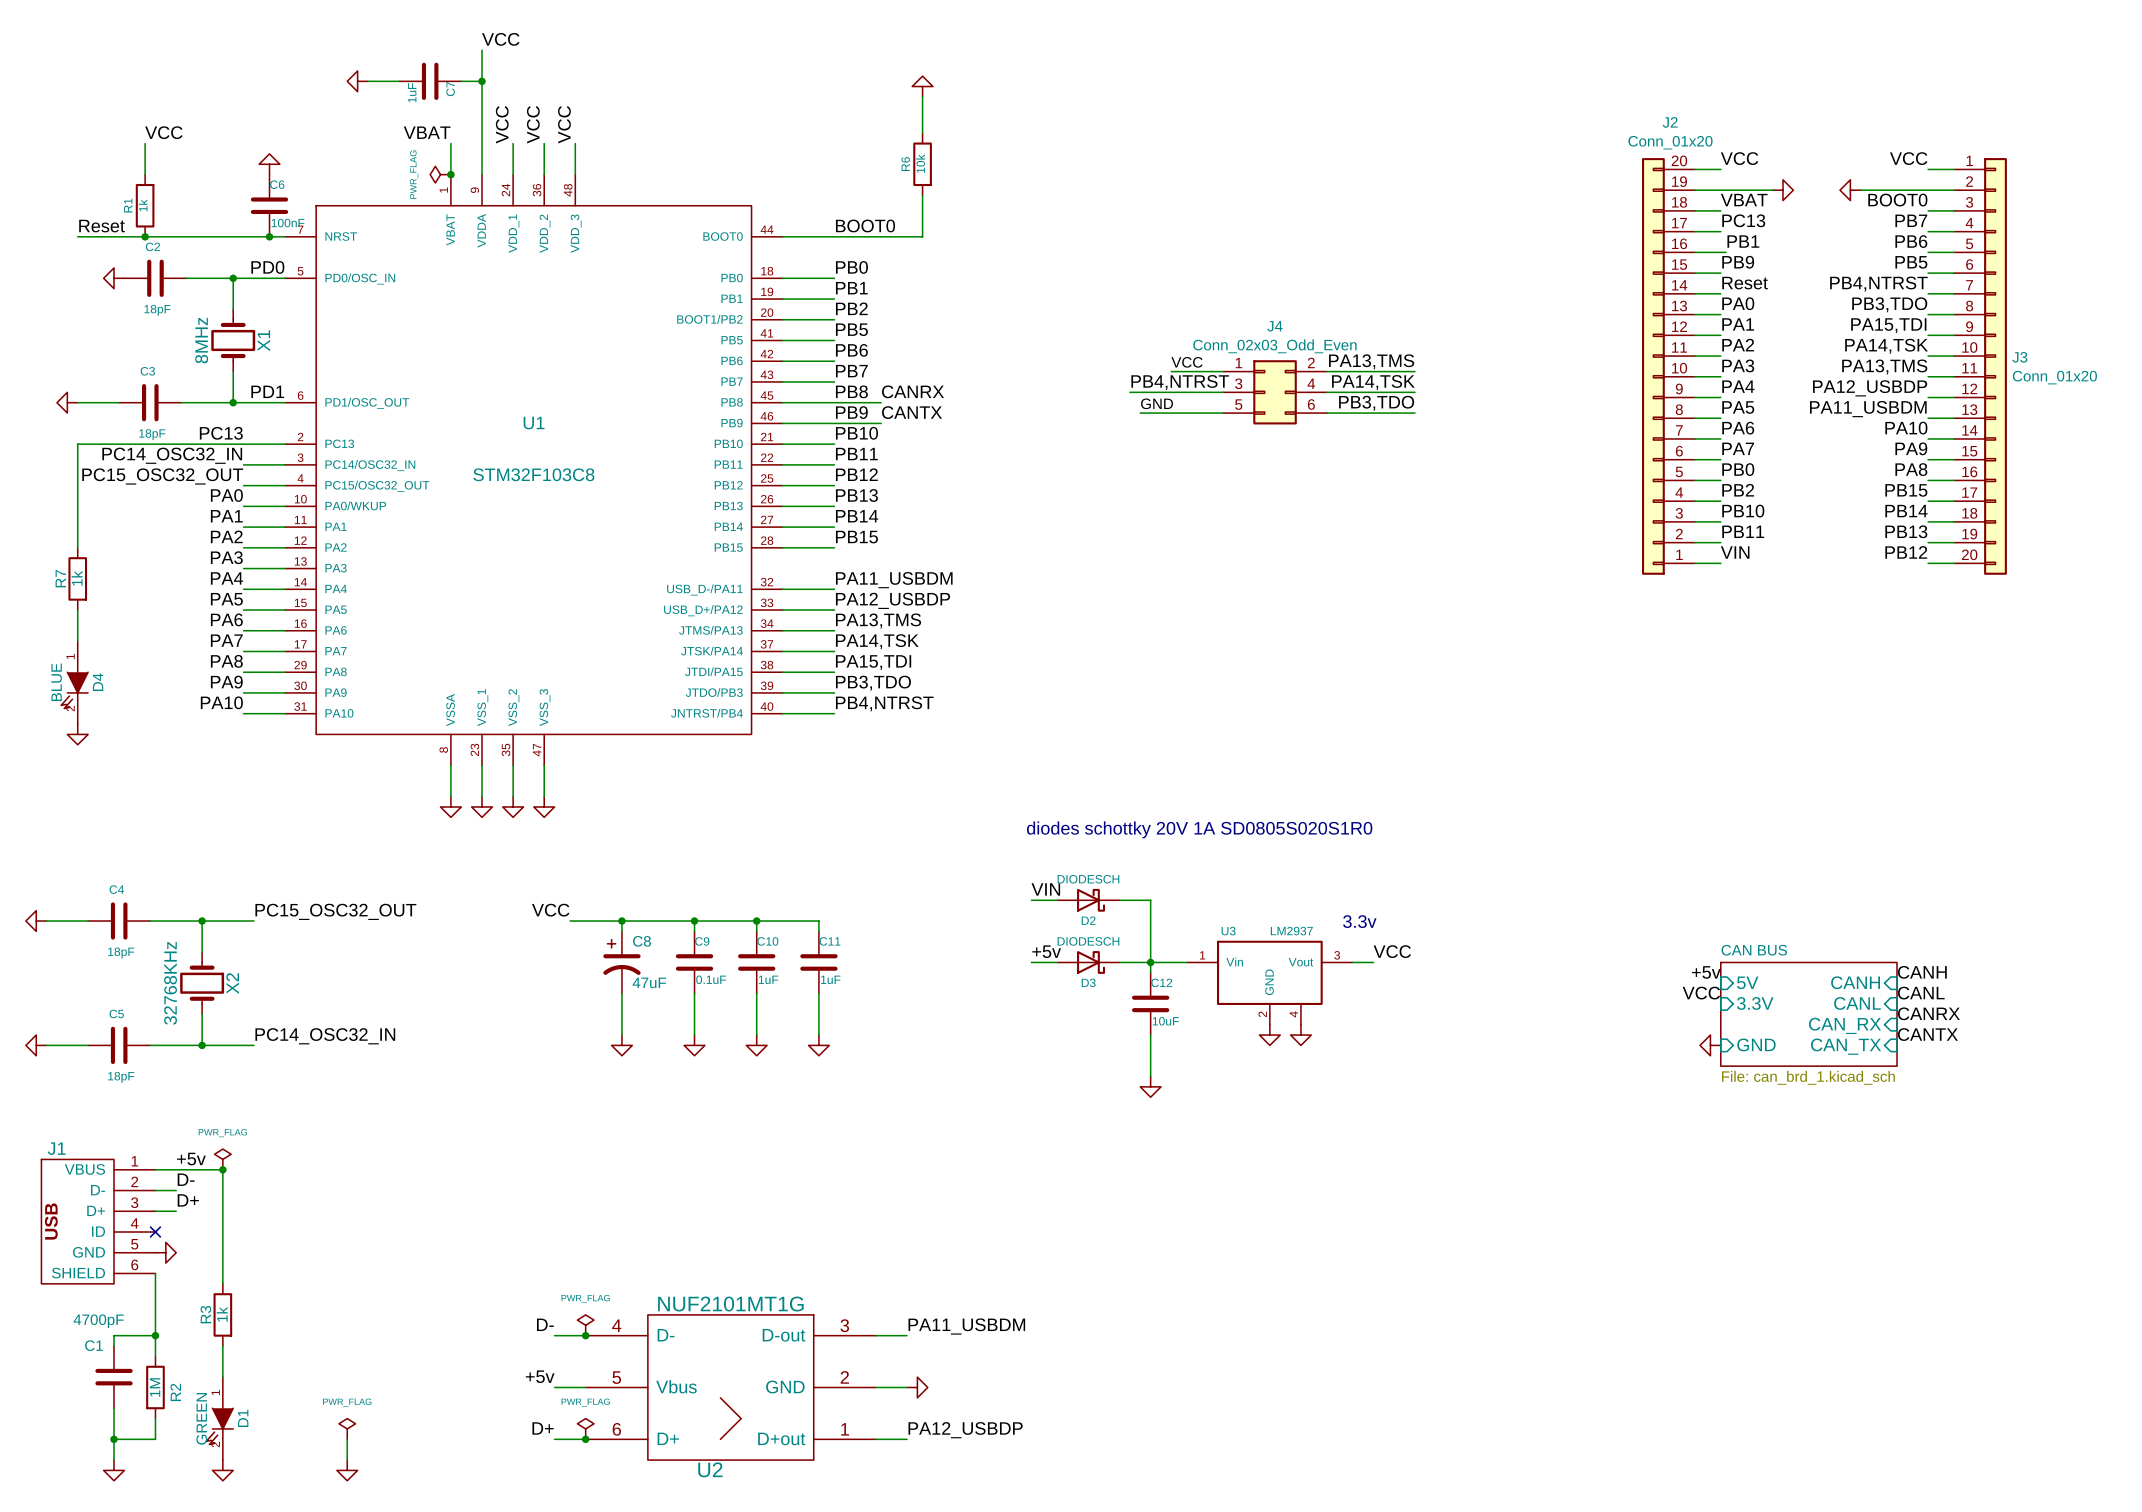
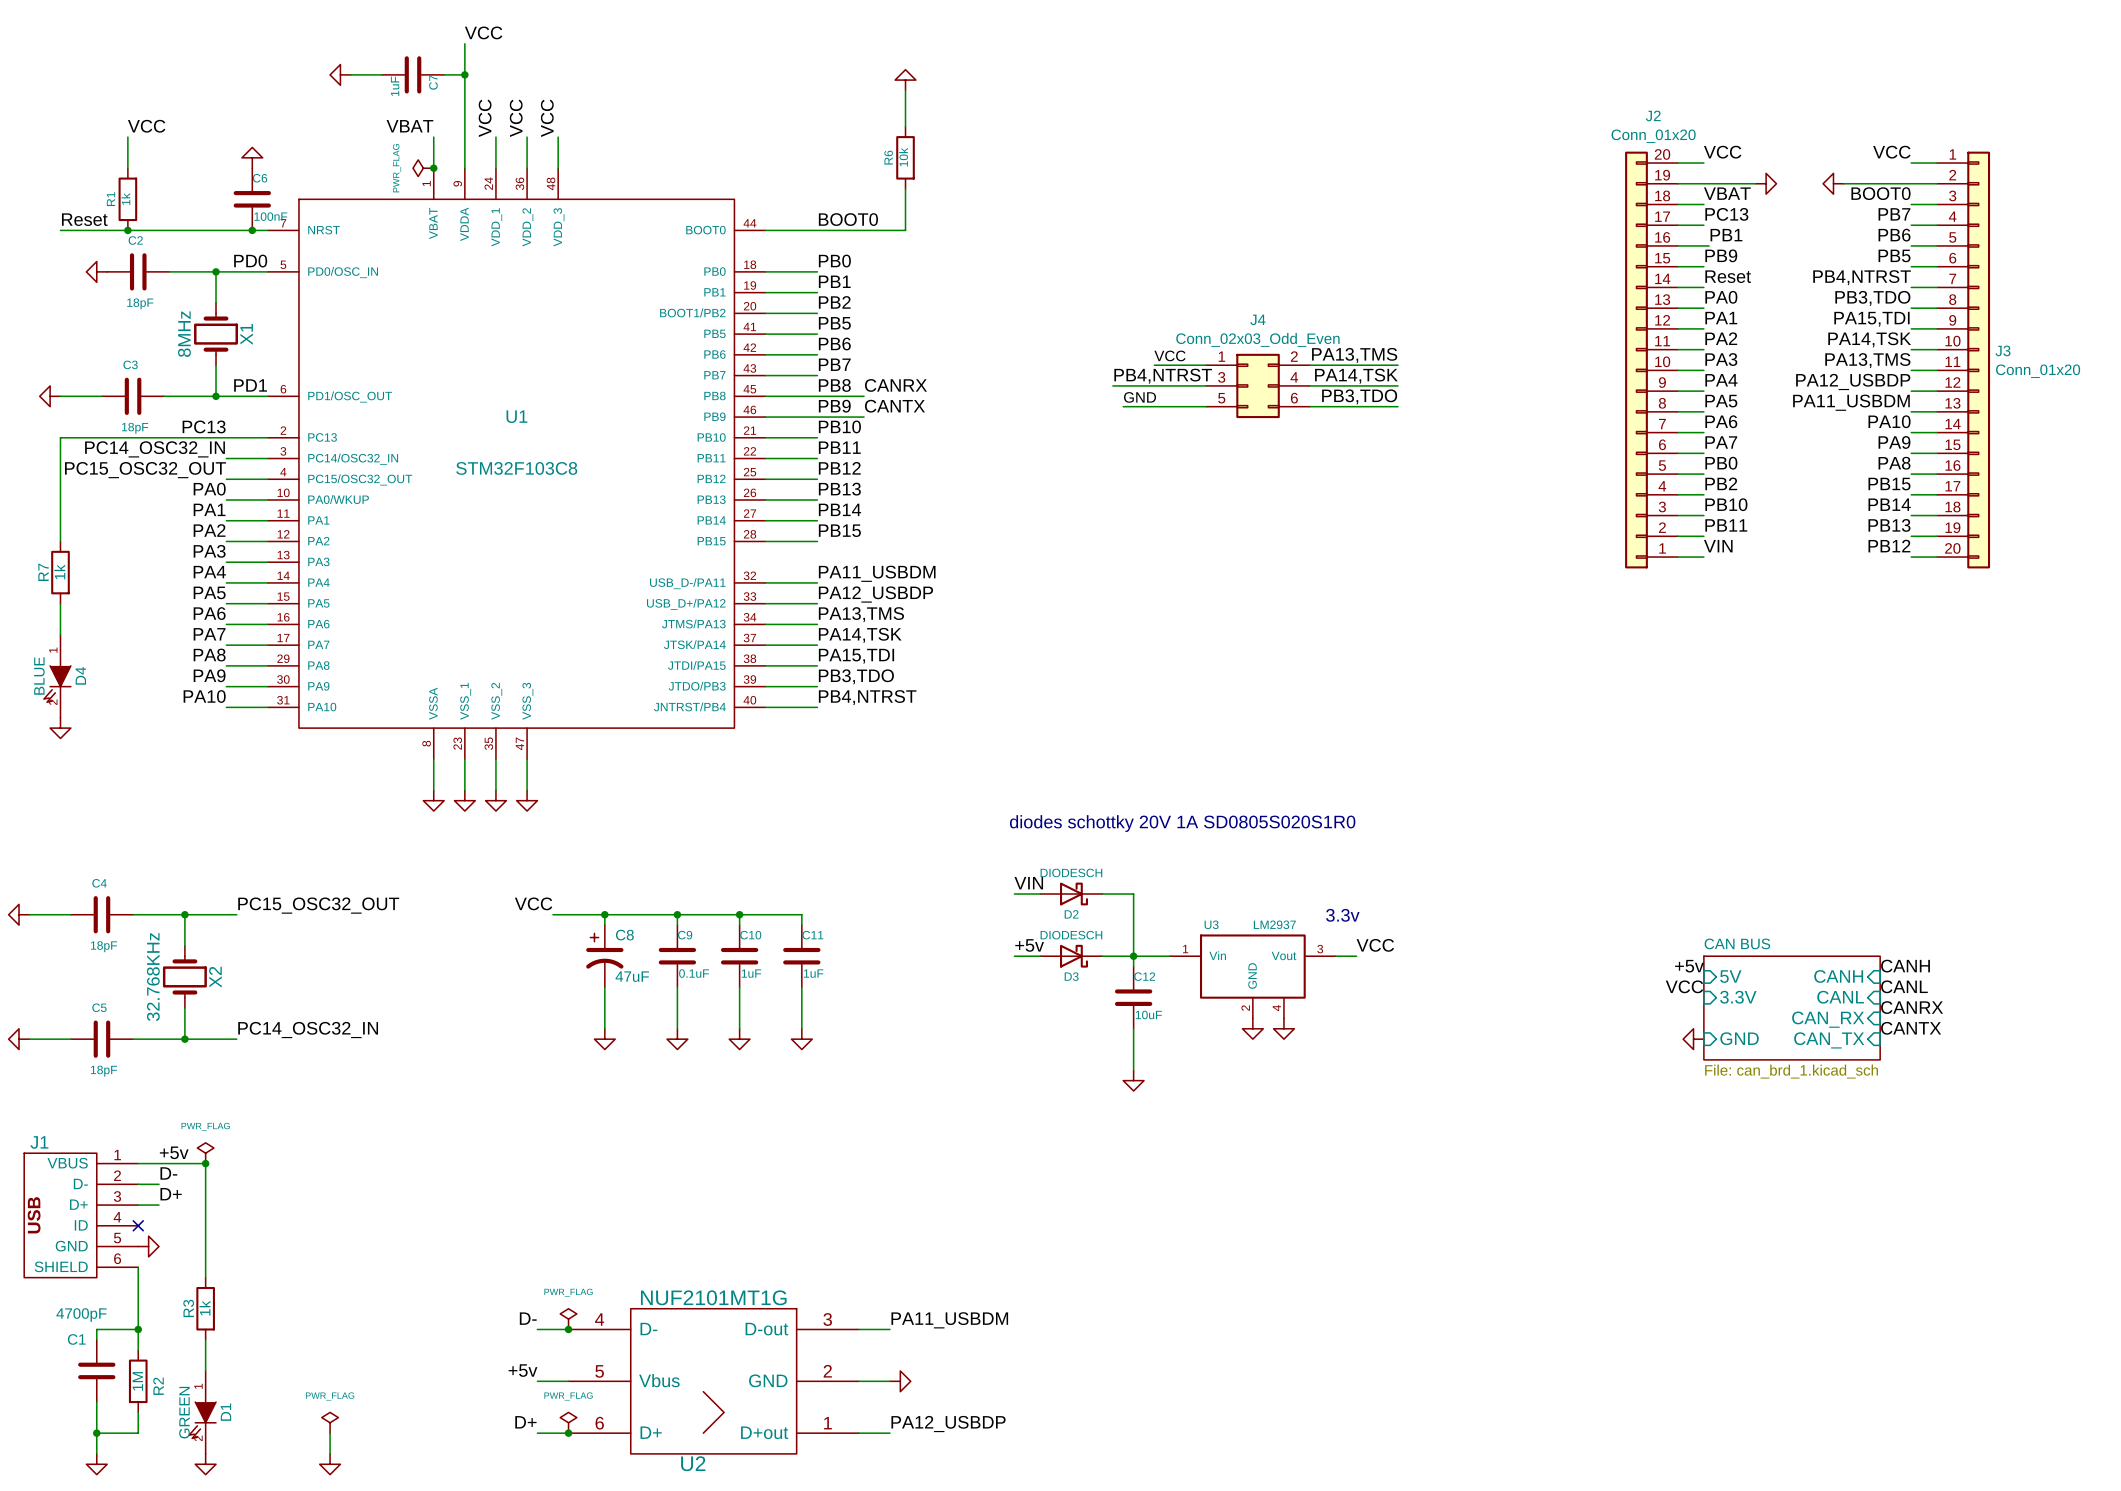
X2 value: 32768KHz (170, 983) -> 32.768KHz (153, 977)

